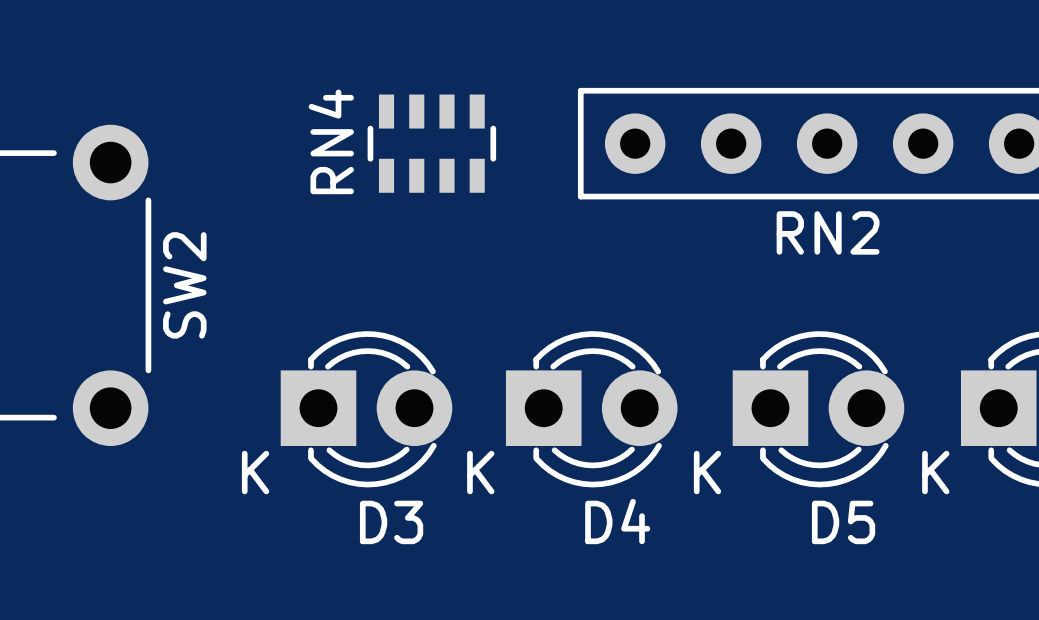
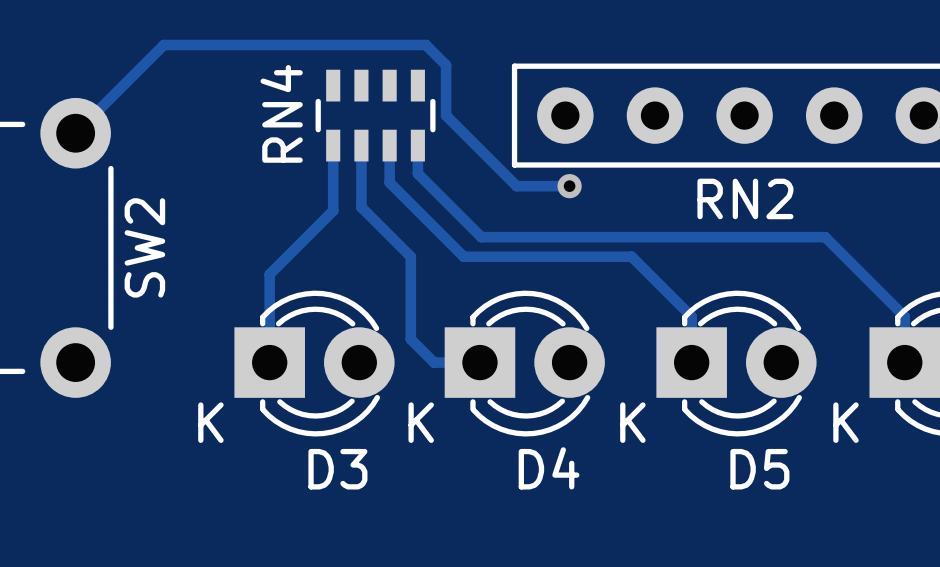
track: none -> (75, 133) (163, 45) (425, 45) (446, 65) (446, 115) (516, 186) (569, 186)
track: none -> (333, 145) (333, 210) (269, 274) (269, 362)
track: none -> (361, 145) (361, 207) (410, 256) (410, 339) (434, 362) (479, 362)
track: none -> (389, 145) (389, 182) (463, 256) (631, 256) (691, 316) (691, 362)
track: none -> (417, 145) (417, 173) (481, 237) (825, 237) (904, 316) (904, 362)
via: none -> (569, 186)

